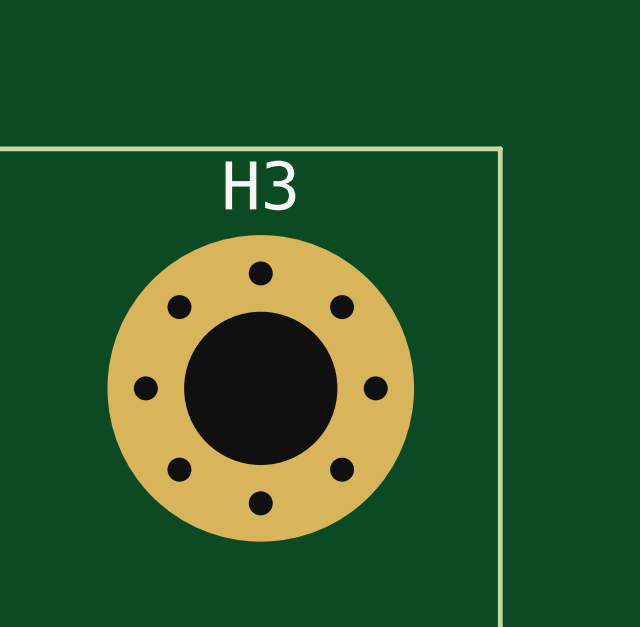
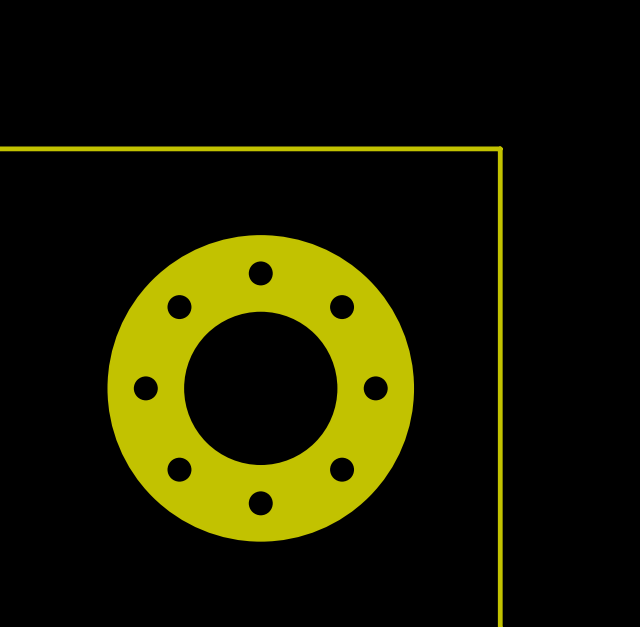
H3 name: H3 (260, 185) -> none

